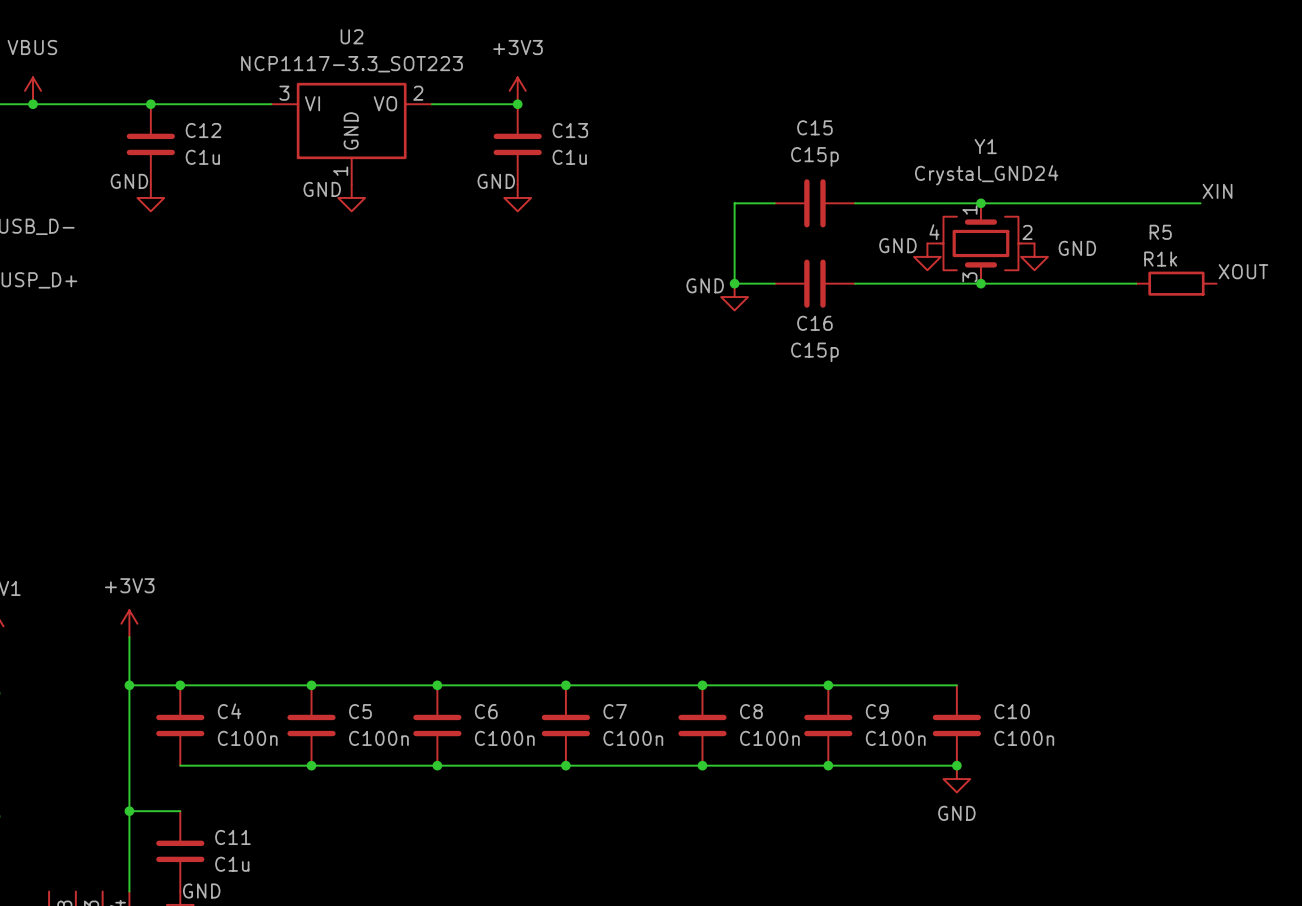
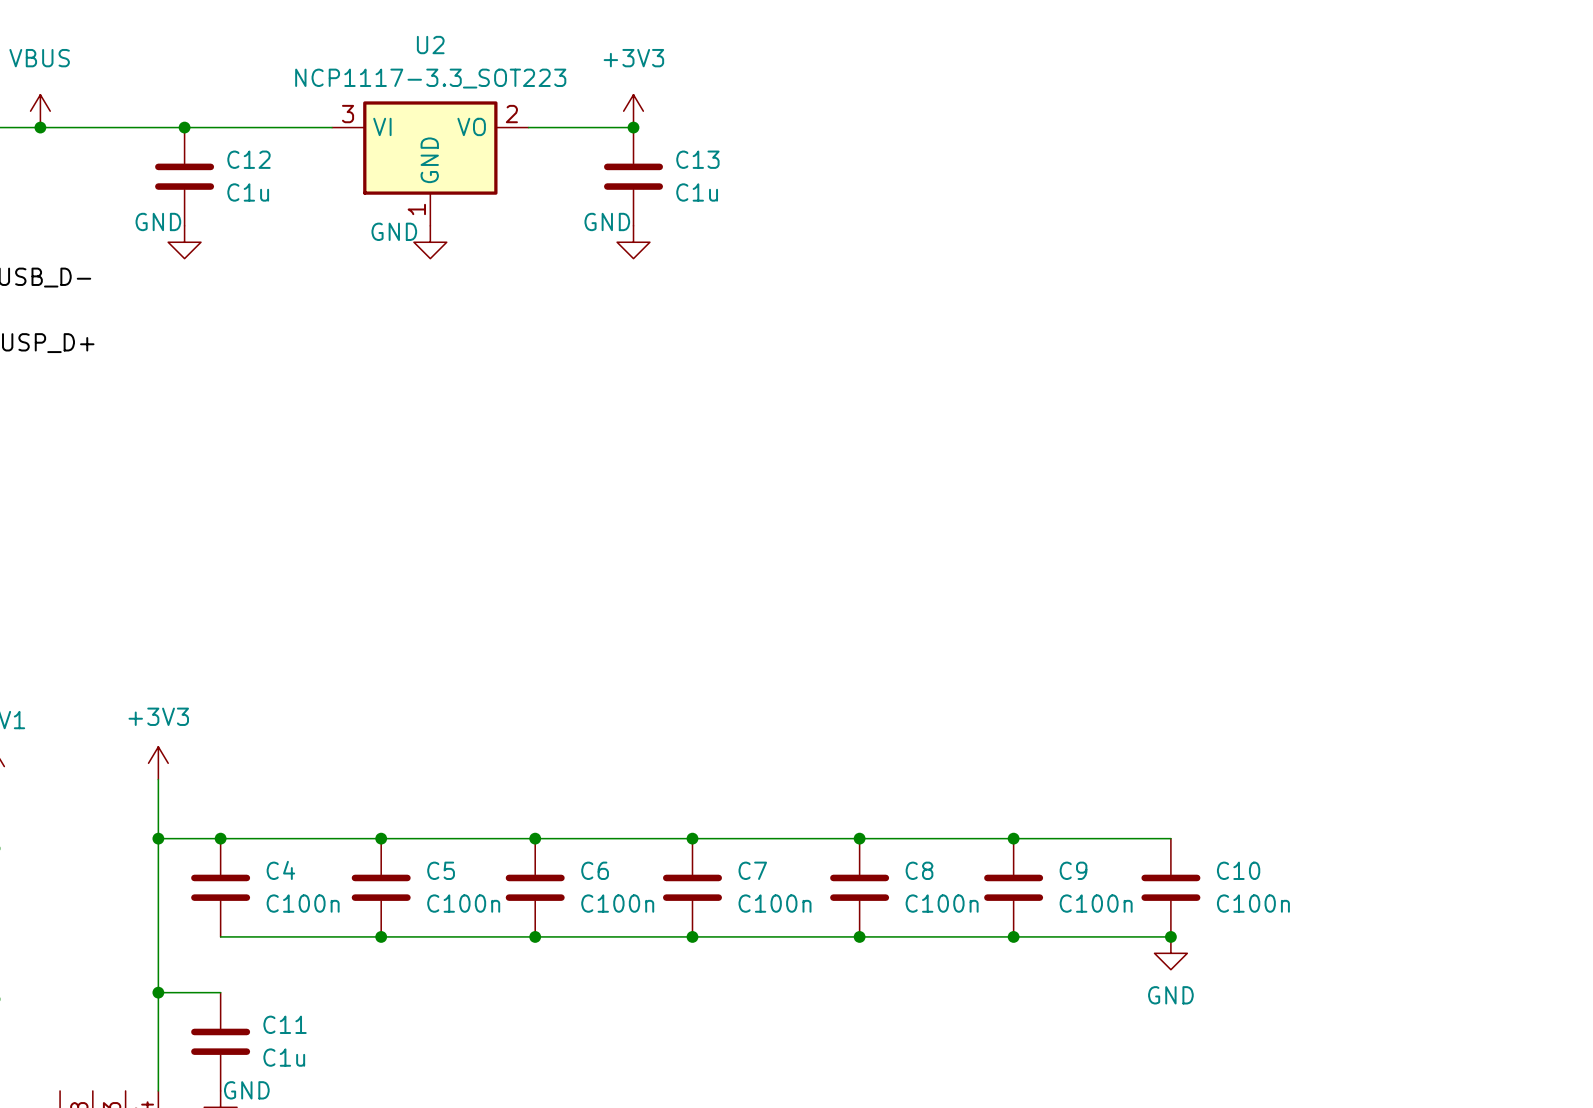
label: XIN (1217, 191) -> none
wire: (774, 203) (734, 203) (734, 283) (774, 283) -> none
C15: C15p (814, 203) -> none
wire: (855, 203) (1200, 203) -> none
junction: (980, 203) -> none
Y1: Crystal_GND24 (980, 243) -> none
power symbol: GND (927, 256) -> none
power symbol: GND (1034, 256) -> none
label: XOUT (1243, 271) -> none
junction: (734, 283) -> none
C16: C15p (814, 283) -> none
wire: (855, 283) (1136, 283) -> none
junction: (980, 283) -> none
R5: R1k (1176, 283) -> none
power symbol: GND (734, 297) -> none

